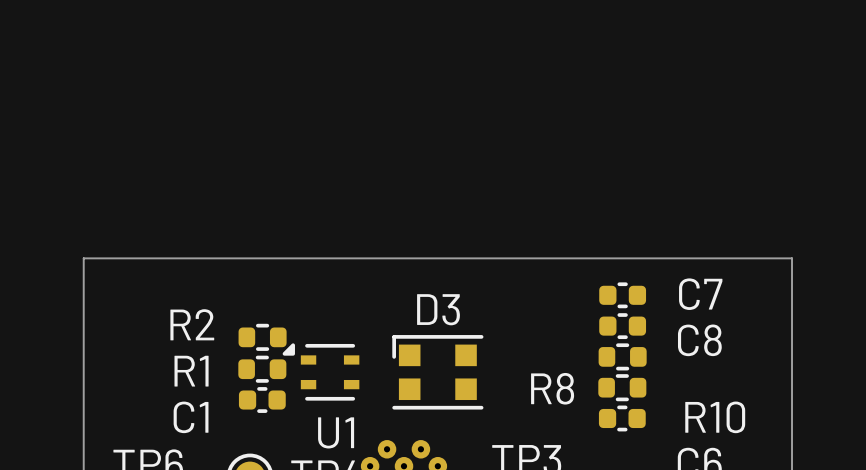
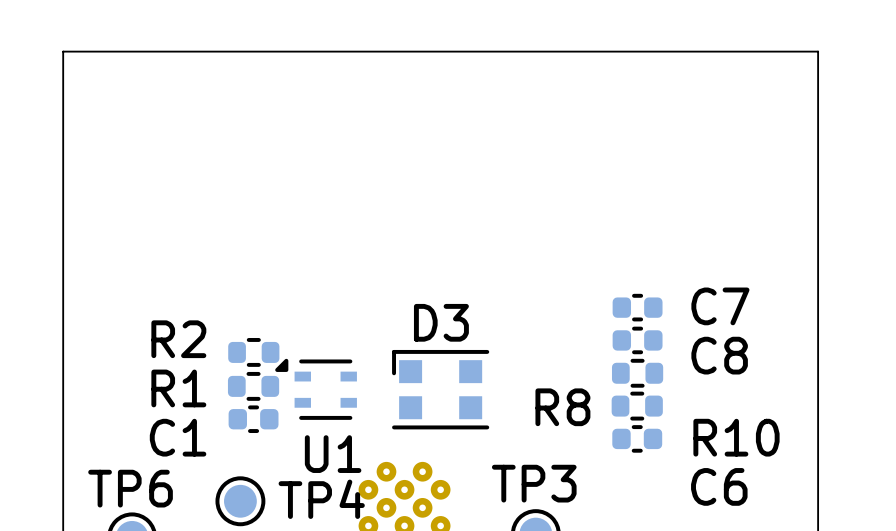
board edge: (792, 258) (83, 258) -> (818, 268) (818, 51) (63, 51) (63, 268)

